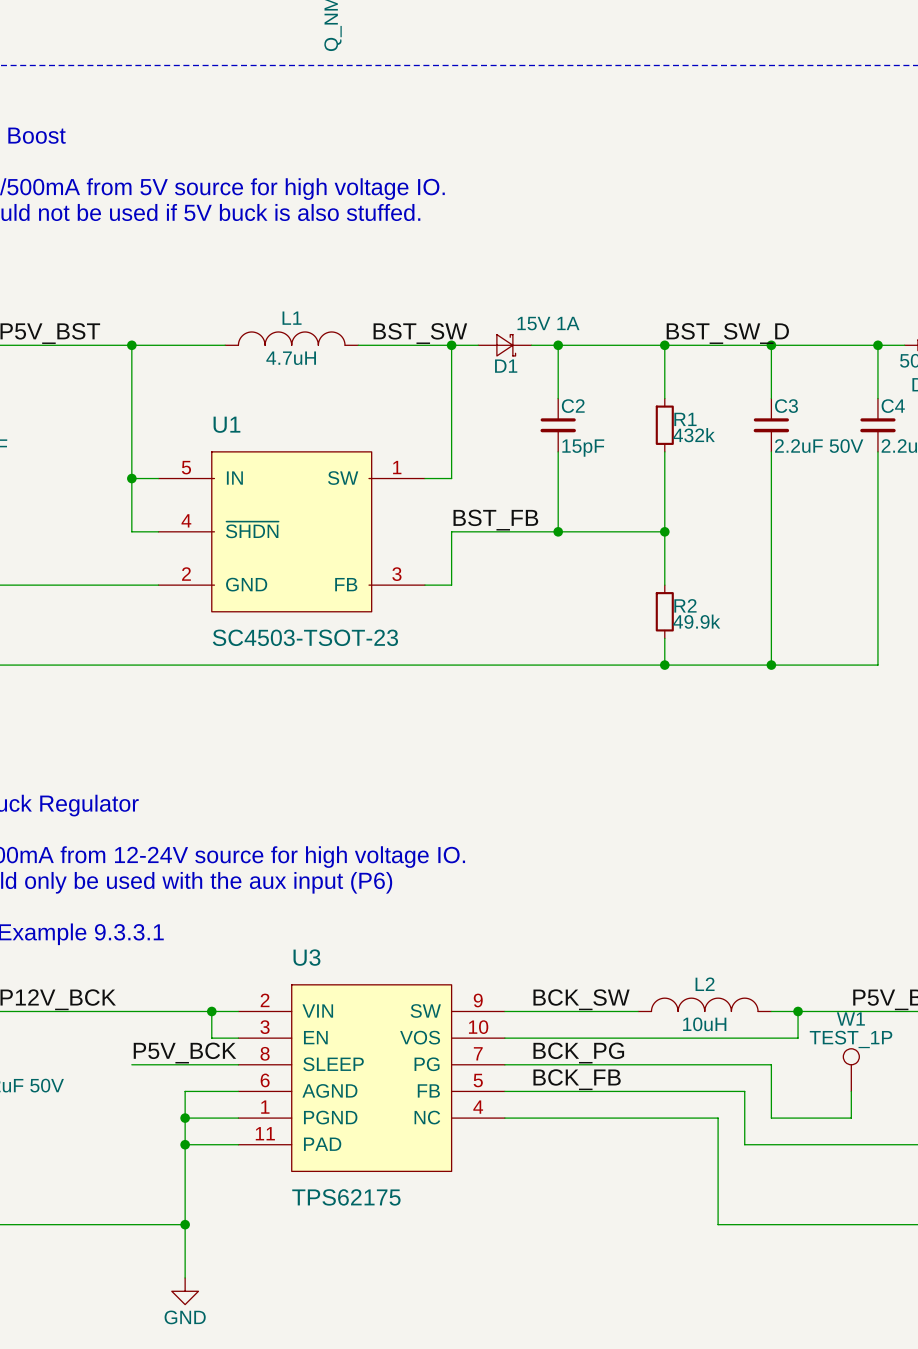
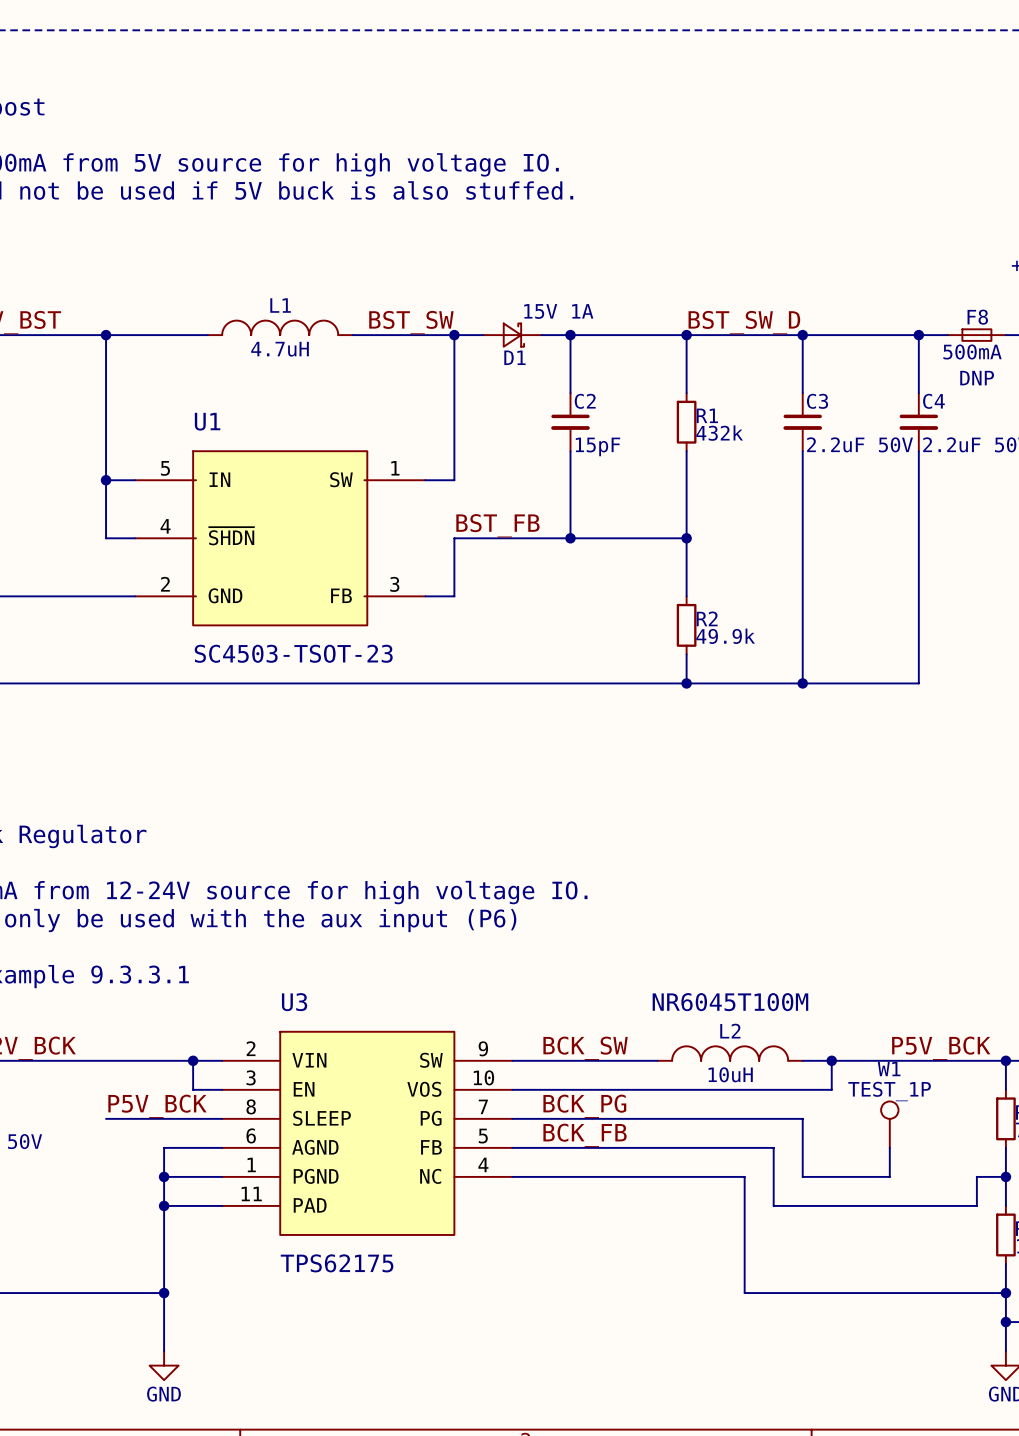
L2 text: none -> NR6045T100M (730, 1002)

